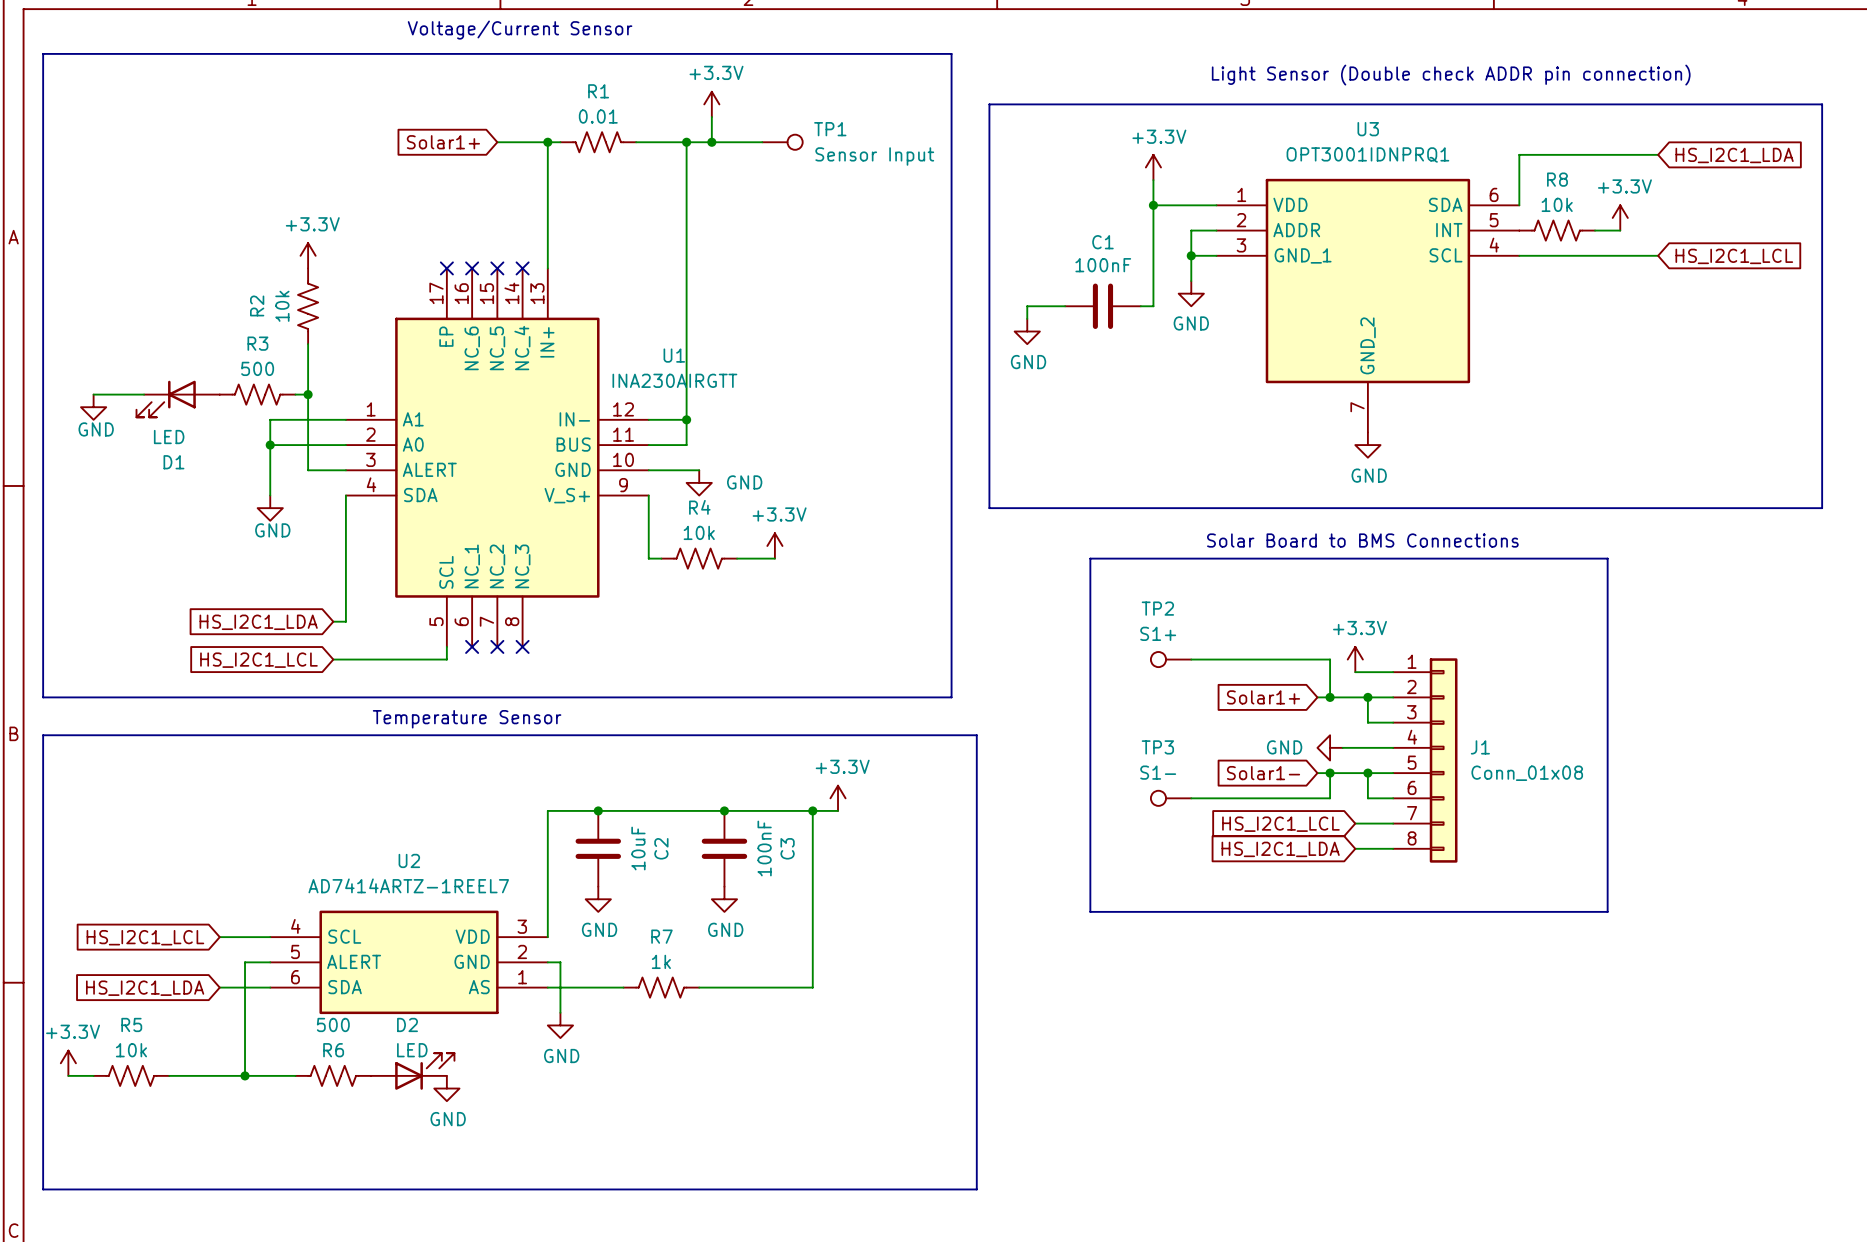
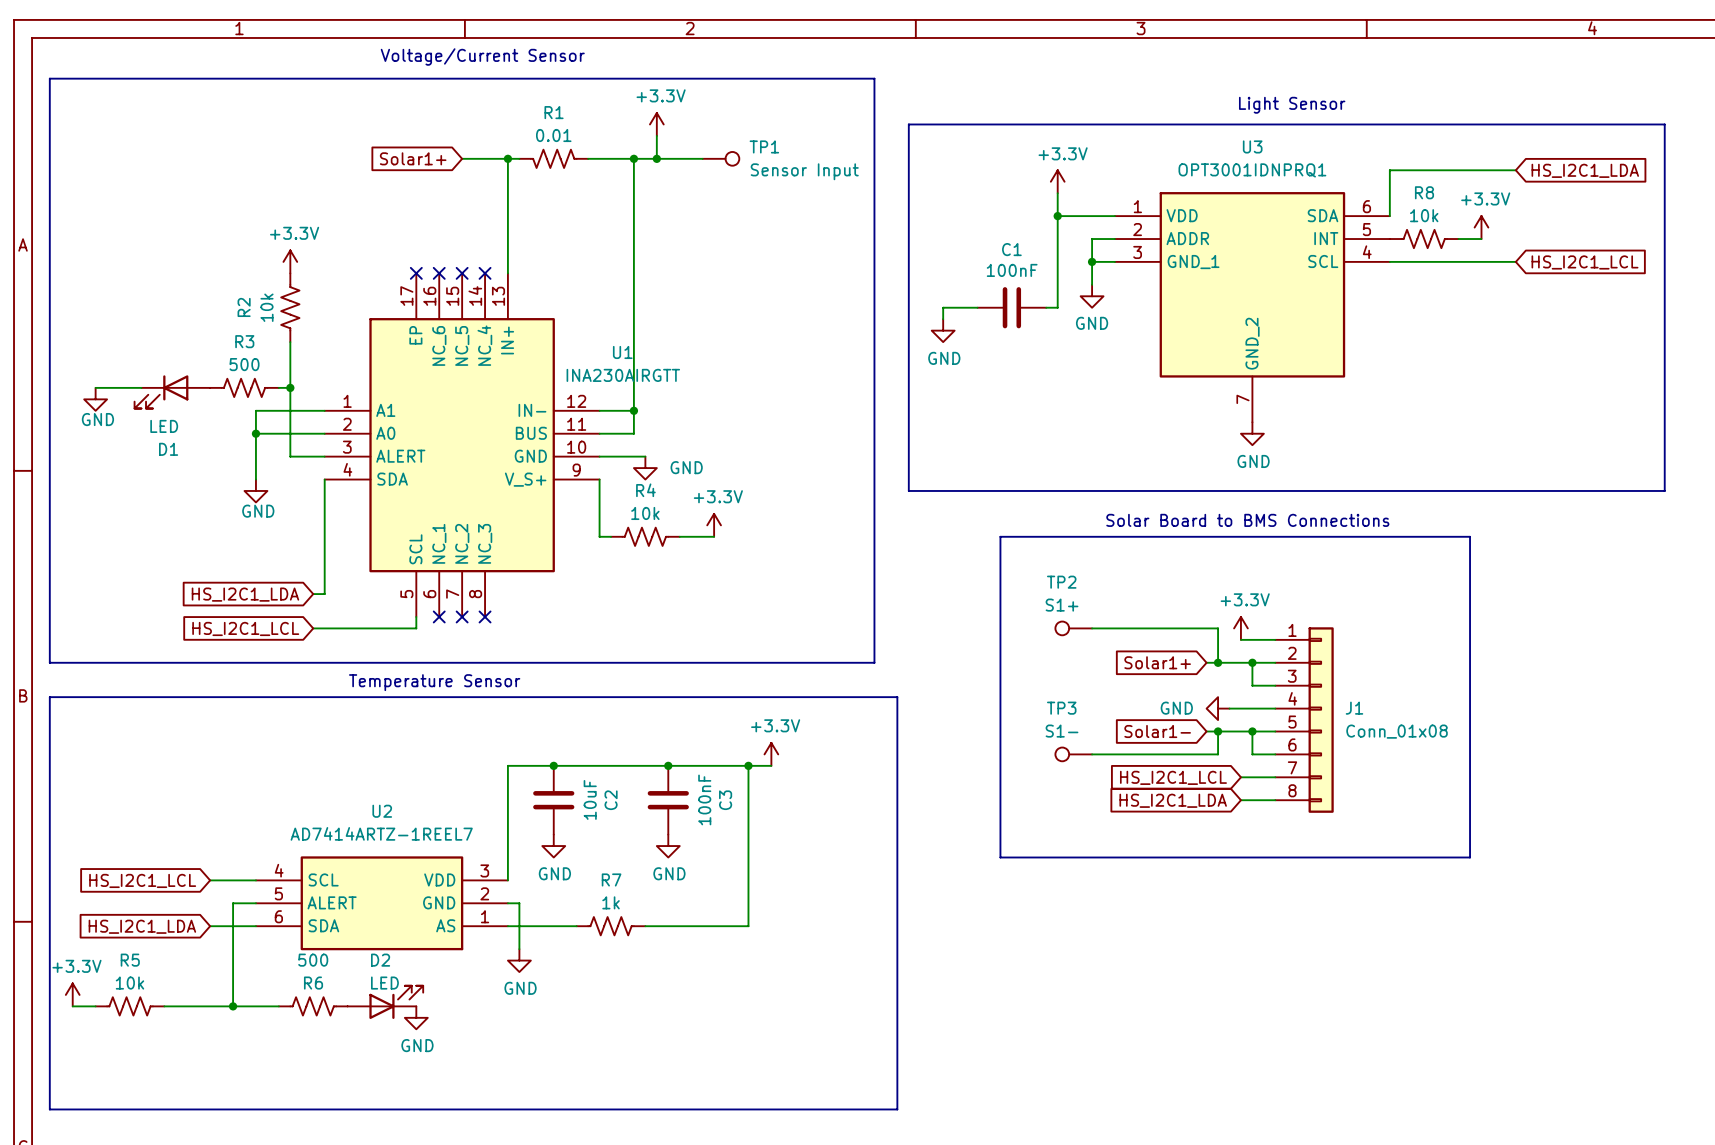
text: Light Sensor (Double check ADDR pin connection) (1451, 75) -> none
text: none -> Light Sensor (1292, 105)

